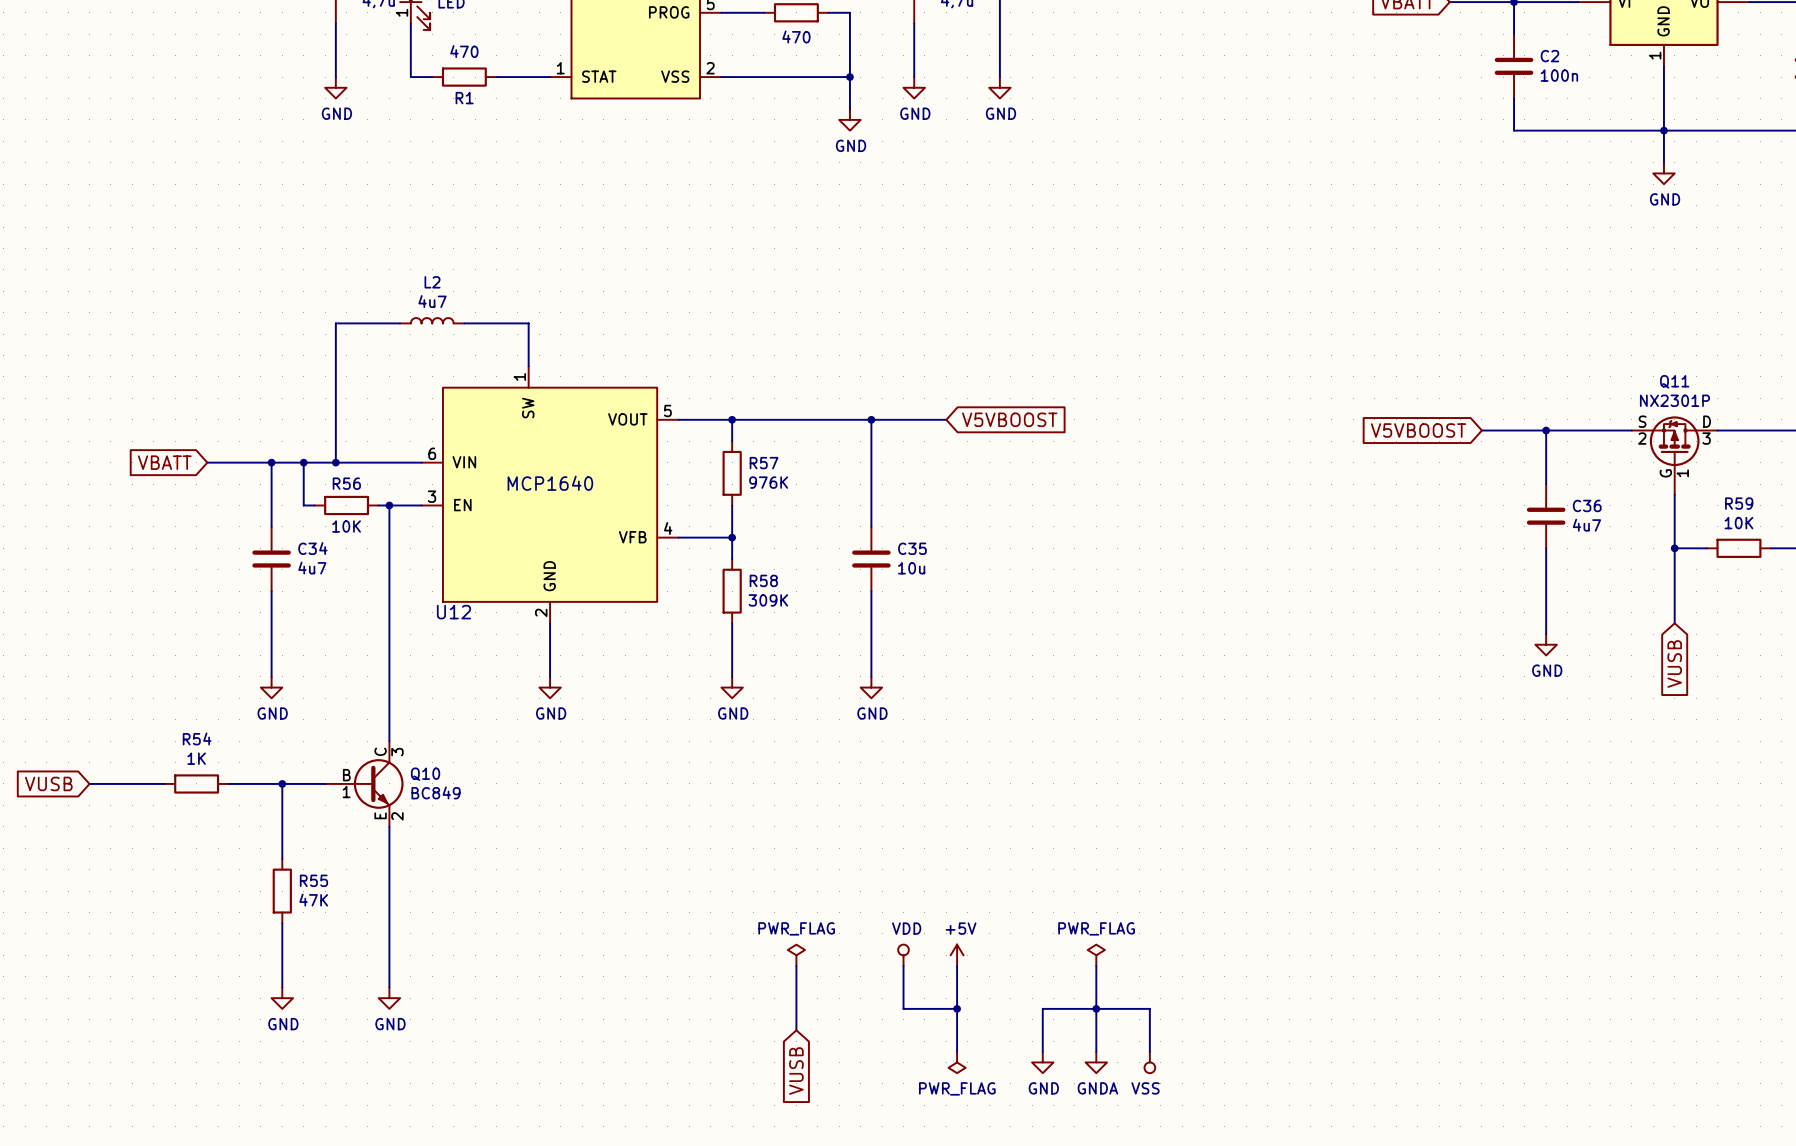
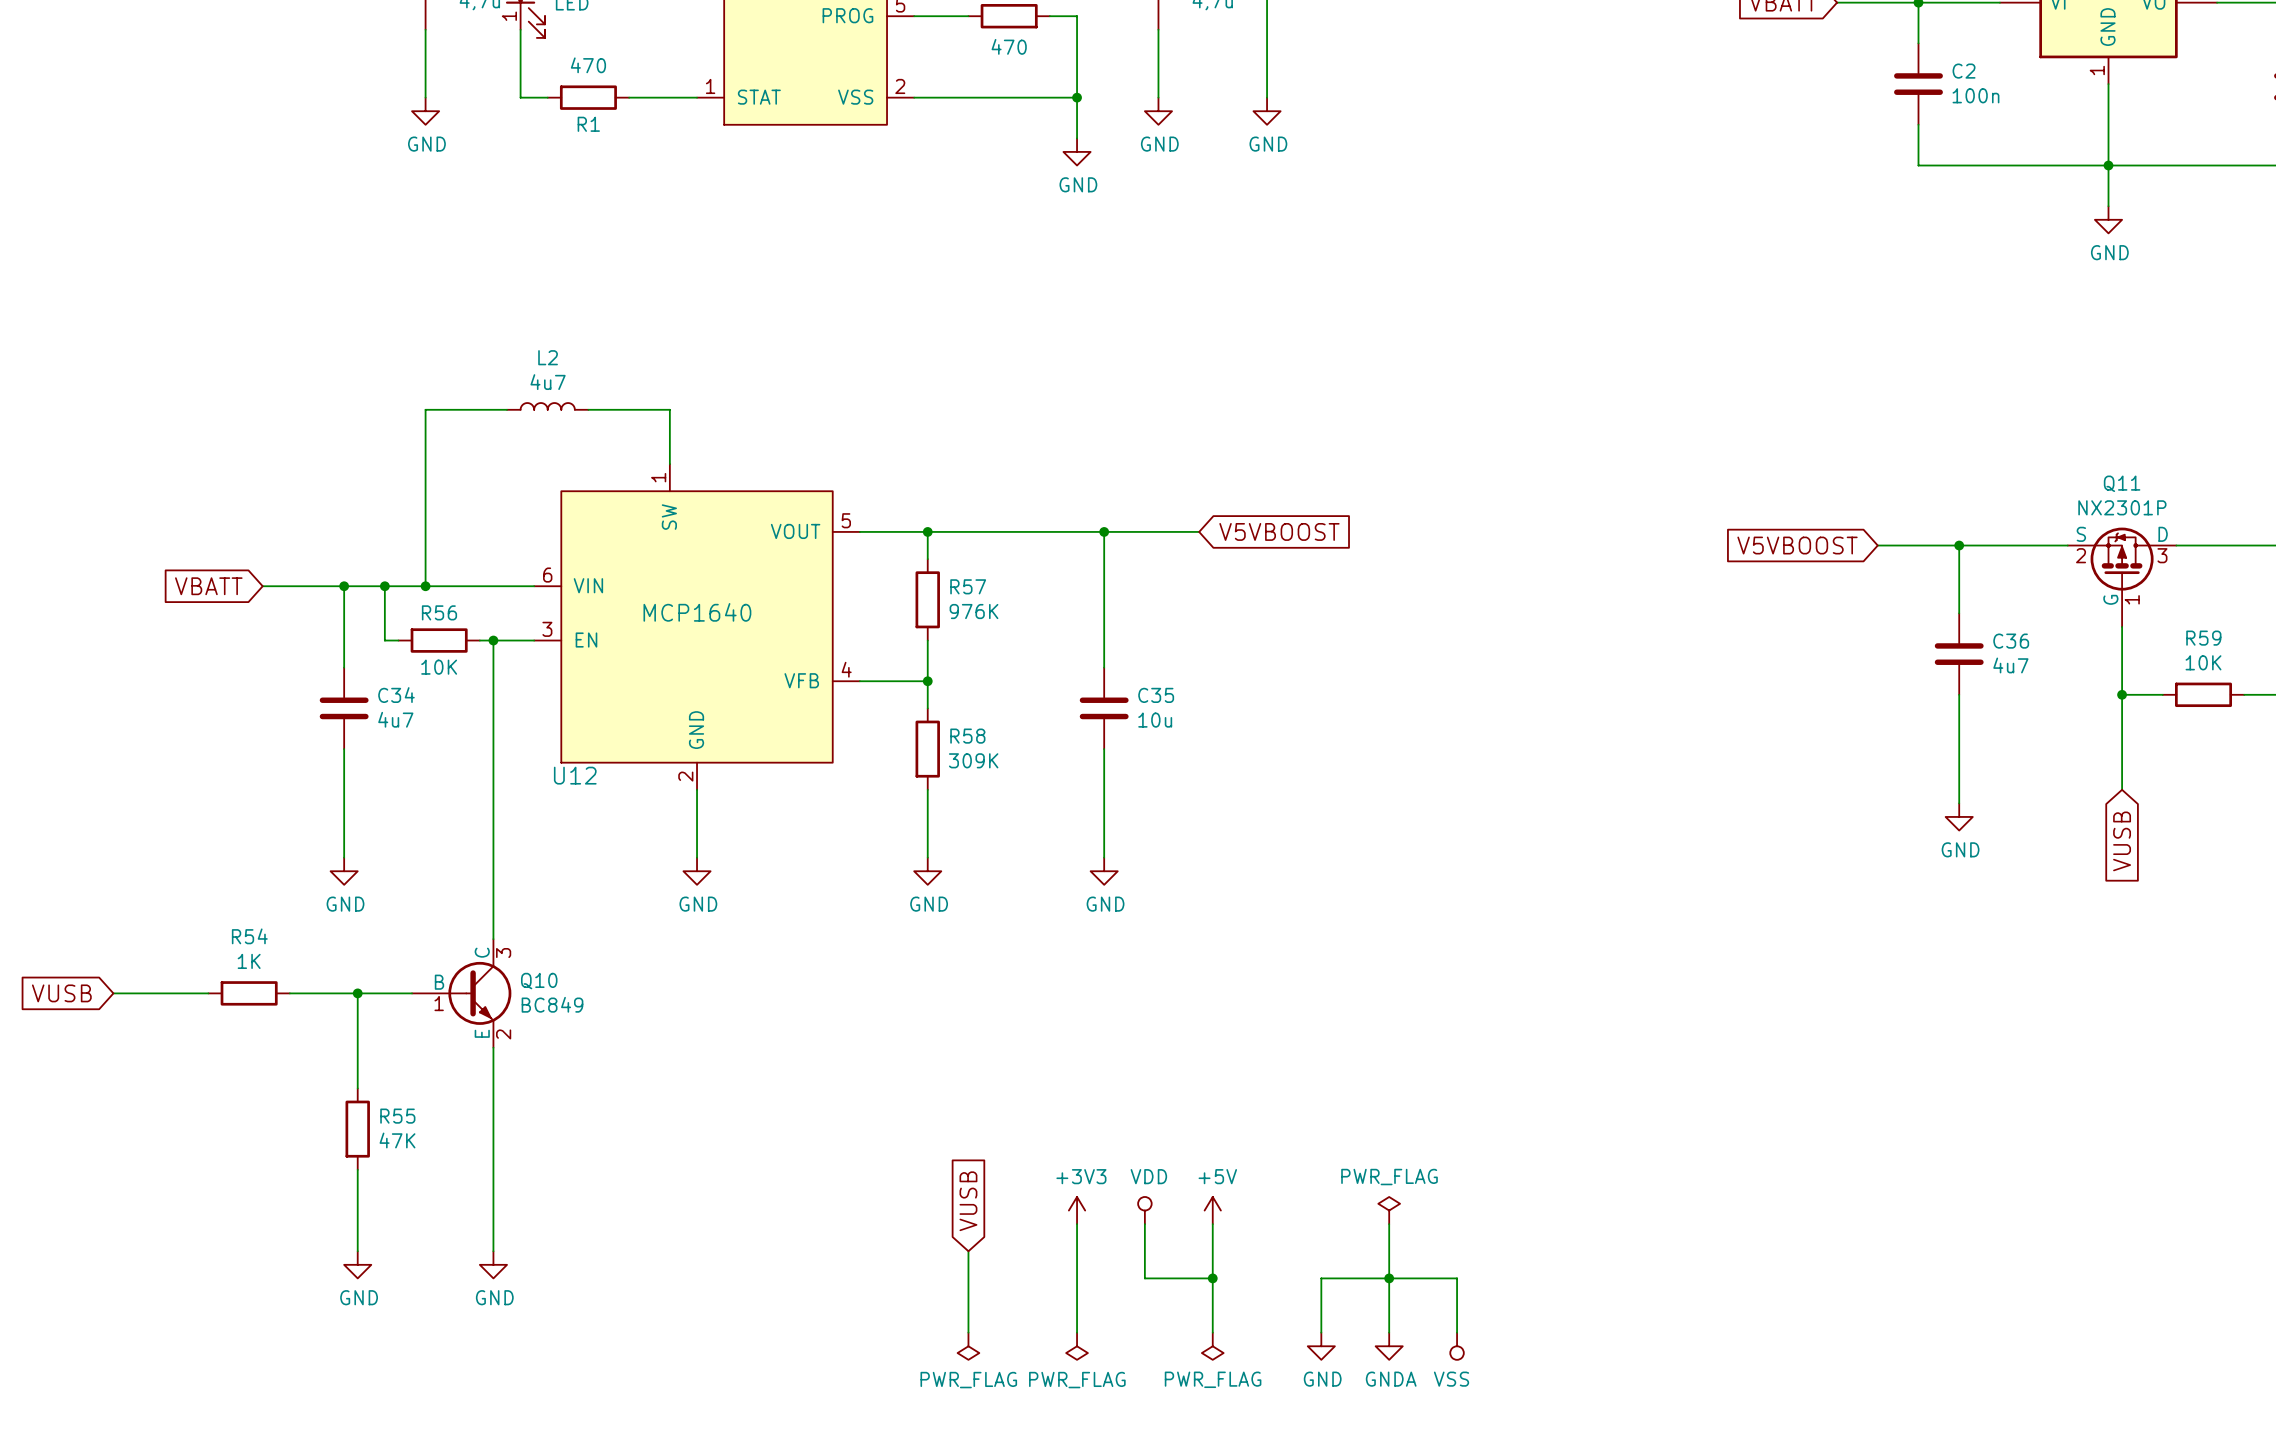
power symbol: PWR_FLAG (796, 955) -> none
power symbol: none -> +3V3 (1077, 1210)
wire: (796, 966) (796, 1030) -> (968, 1251) (968, 1332)
wire: none -> (1077, 1224) (1077, 1332)
power symbol: none -> PWR_FLAG (968, 1346)
power symbol: none -> PWR_FLAG (1077, 1346)
global label rotation: 0° (796, 1071) -> 180° (968, 1201)
global label position: VUSB (796, 1071) -> VUSB (968, 1201)

